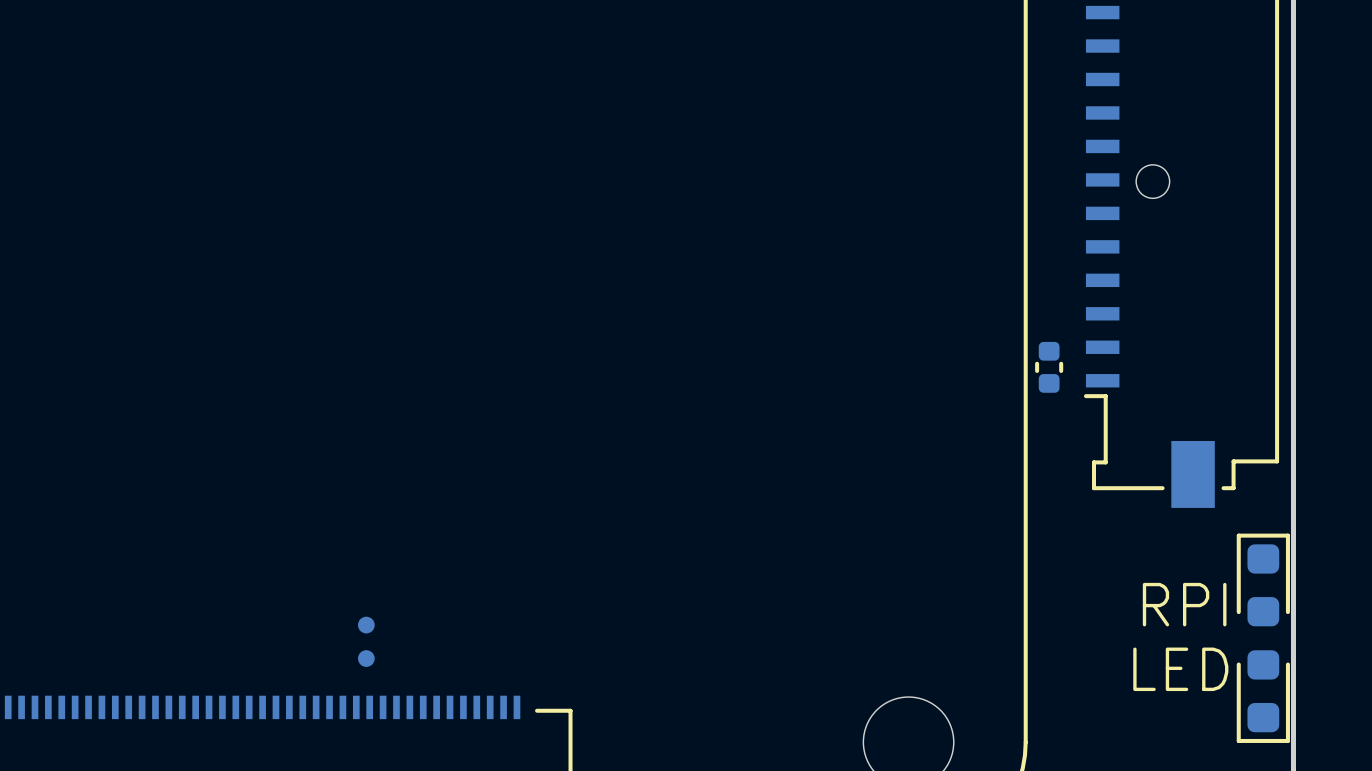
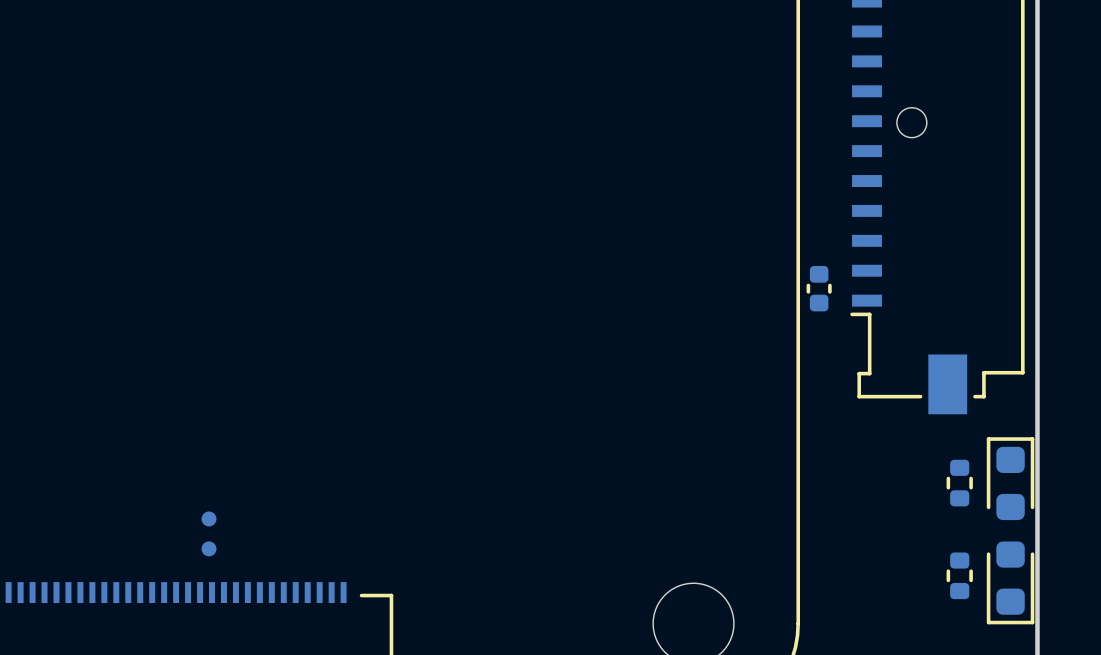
part: none -> (959, 483)
text: RPI (1184, 604) -> none
text: LED (1180, 669) -> none
part: none -> (959, 575)

